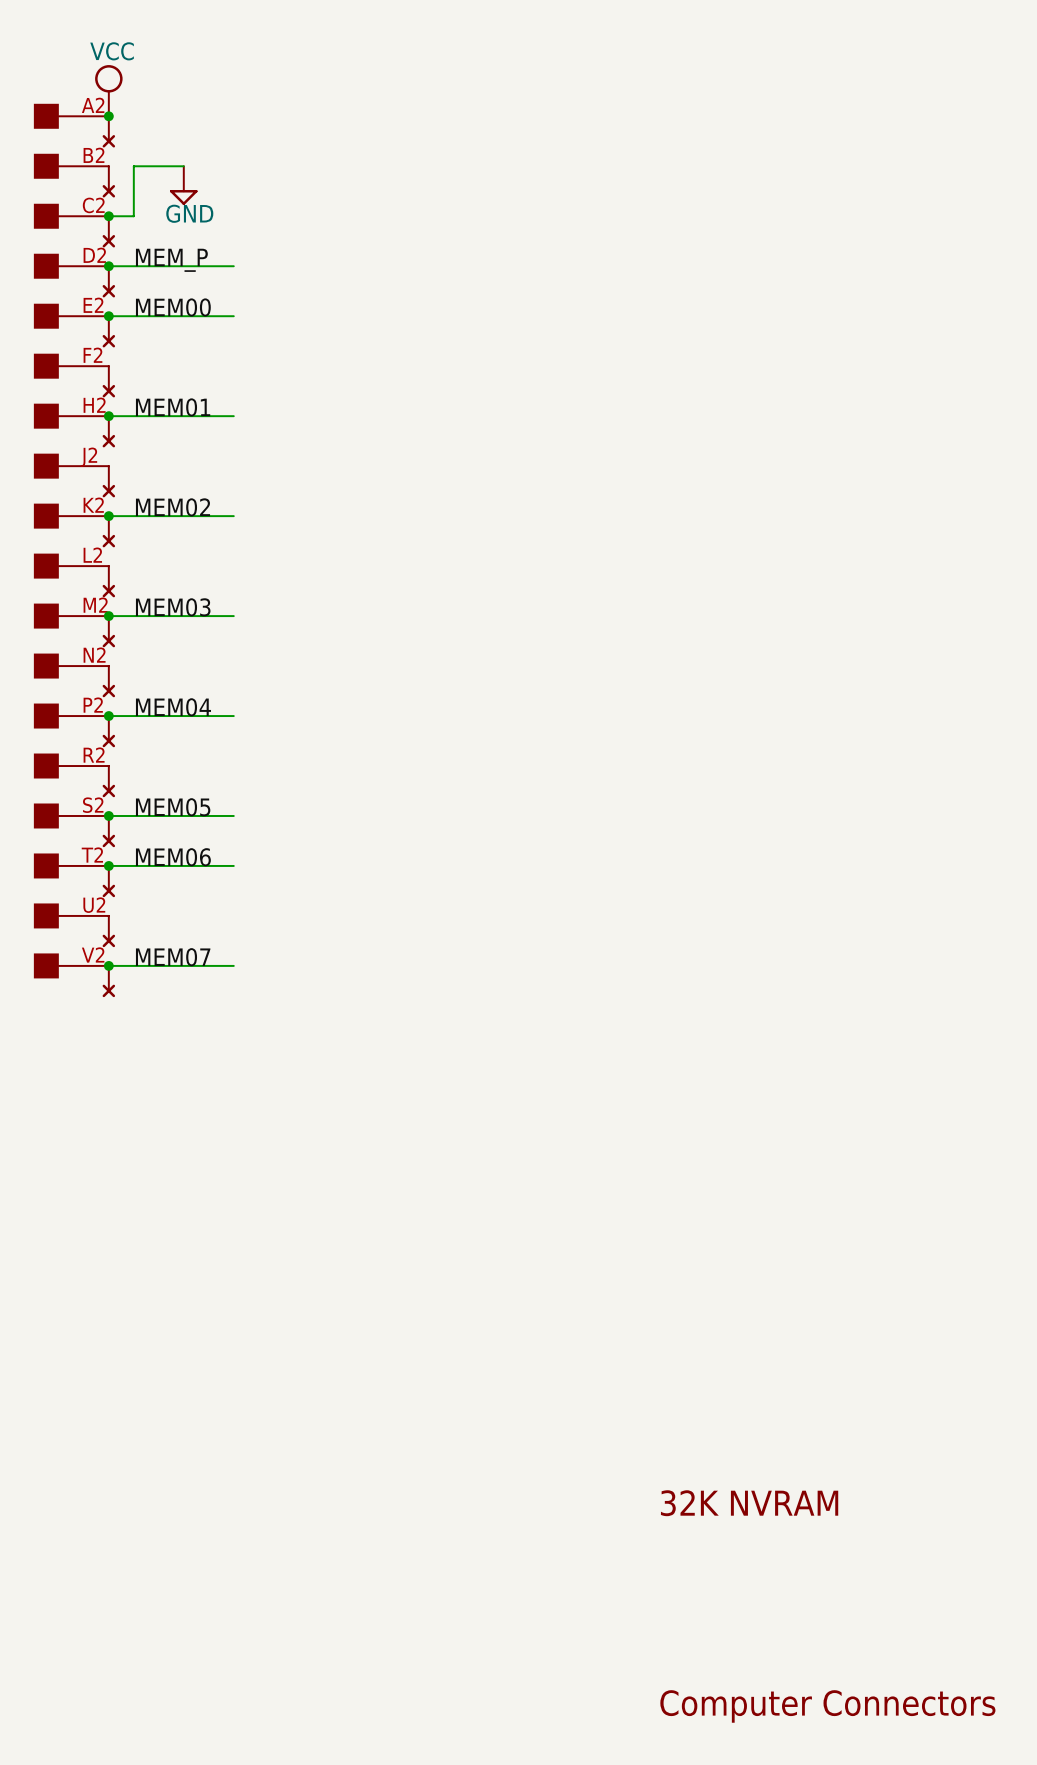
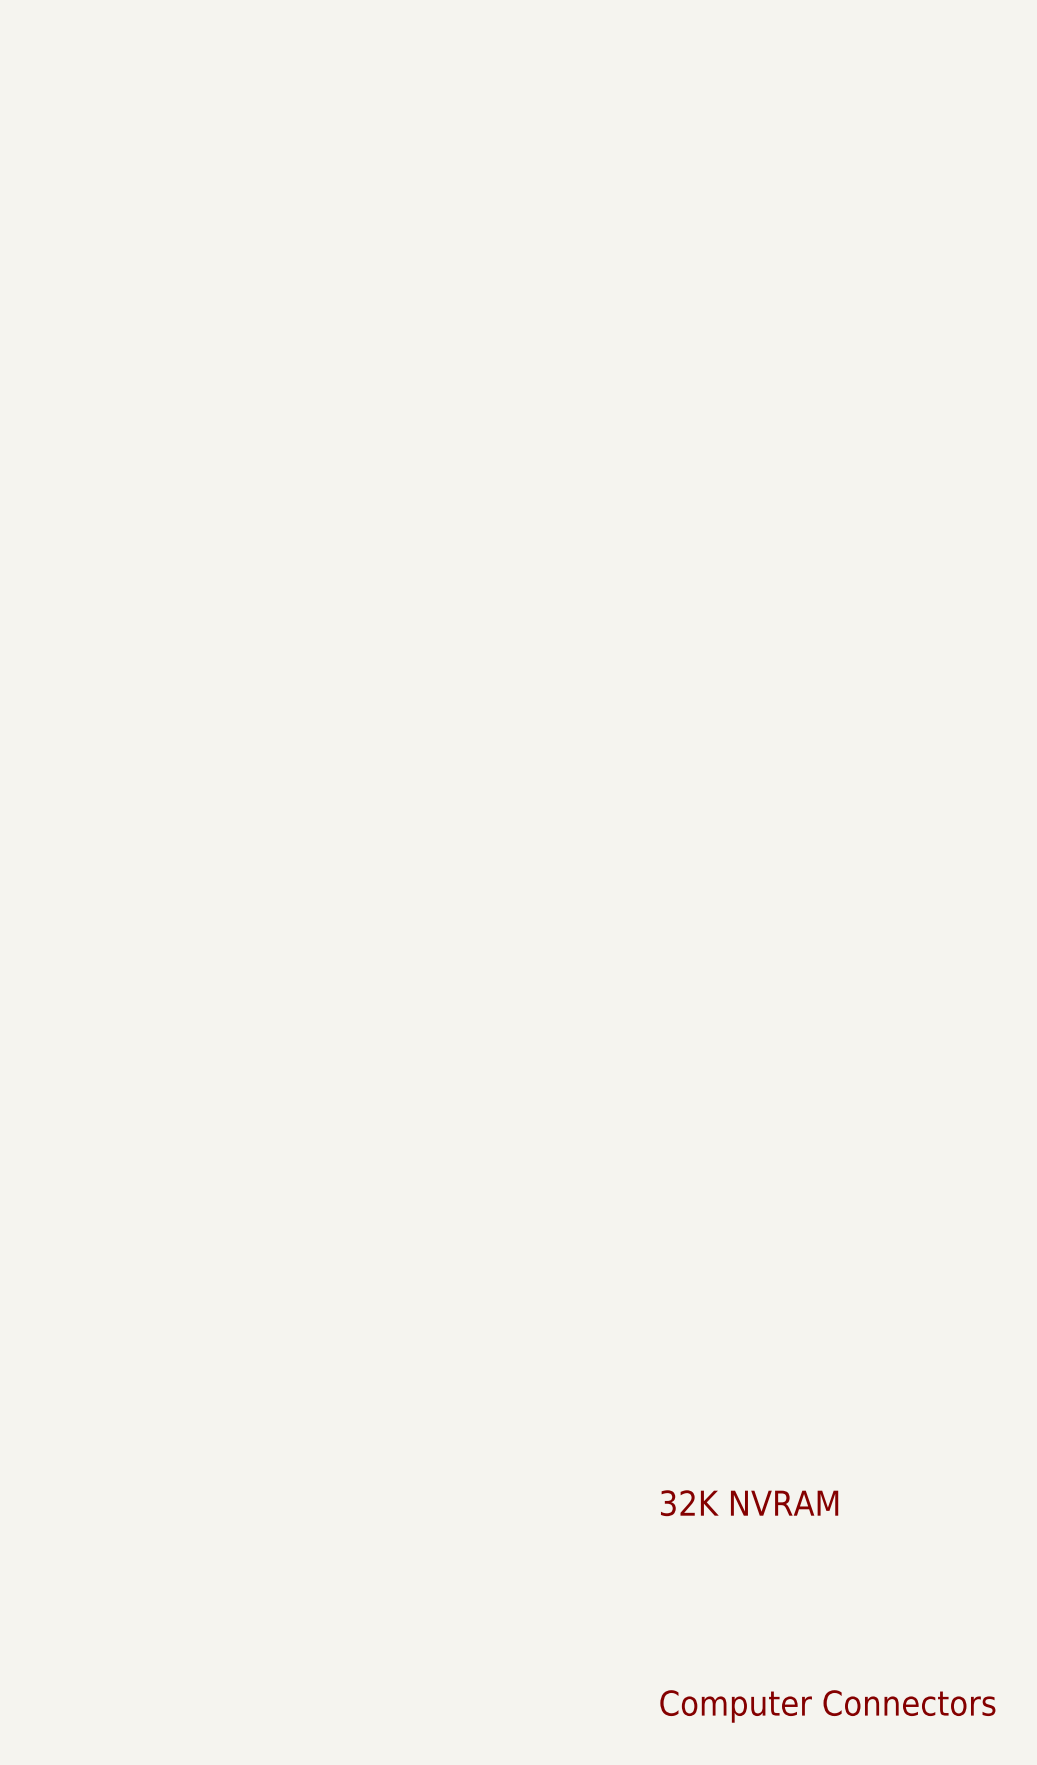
power symbol: VCC (108, 90) -> none
part: (71, 116) -> none
junction: (108, 116) -> none
part: (108, 131) -> none
part: (71, 166) -> none
wire: (183, 166) (133, 166) (133, 216) (108, 216) -> none
part: (108, 181) -> none
power symbol: GND (183, 185) -> none
part: (71, 216) -> none
junction: (108, 216) -> none
part: (108, 231) -> none
label: MEM_P (171, 260) -> none
part: (71, 266) -> none
wire: (108, 266) (233, 266) -> none
junction: (108, 266) -> none
part: (108, 281) -> none
label: MEM00 (173, 307) -> none
part: (71, 316) -> none
wire: (108, 316) (233, 316) -> none
junction: (108, 316) -> none
part: (108, 331) -> none
part: (71, 366) -> none
part: (108, 381) -> none
label: MEM01 (173, 407) -> none
part: (71, 416) -> none
wire: (108, 416) (233, 416) -> none
junction: (108, 416) -> none
part: (108, 431) -> none
part: (71, 466) -> none
part: (108, 481) -> none
label: MEM02 (173, 507) -> none
part: (71, 516) -> none
wire: (108, 516) (233, 516) -> none
junction: (108, 516) -> none
part: (108, 531) -> none
part: (71, 566) -> none
part: (108, 581) -> none
label: MEM03 (173, 607) -> none
part: (71, 616) -> none
wire: (108, 616) (233, 616) -> none
junction: (108, 616) -> none
part: (108, 631) -> none
part: (71, 666) -> none
part: (108, 681) -> none
label: MEM04 (173, 707) -> none
part: (71, 716) -> none
wire: (108, 716) (233, 716) -> none
junction: (108, 716) -> none
part: (108, 731) -> none
part: (71, 766) -> none
part: (108, 781) -> none
label: MEM05 (173, 807) -> none
part: (71, 815) -> none
wire: (108, 815) (233, 815) -> none
junction: (108, 815) -> none
part: (108, 831) -> none
label: MEM06 (173, 857) -> none
part: (71, 865) -> none
wire: (108, 865) (233, 865) -> none
junction: (108, 865) -> none
part: (108, 881) -> none
part: (71, 915) -> none
part: (108, 931) -> none
label: MEM07 (173, 957) -> none
part: (71, 965) -> none
wire: (108, 965) (233, 965) -> none
junction: (108, 965) -> none
part: (108, 981) -> none

